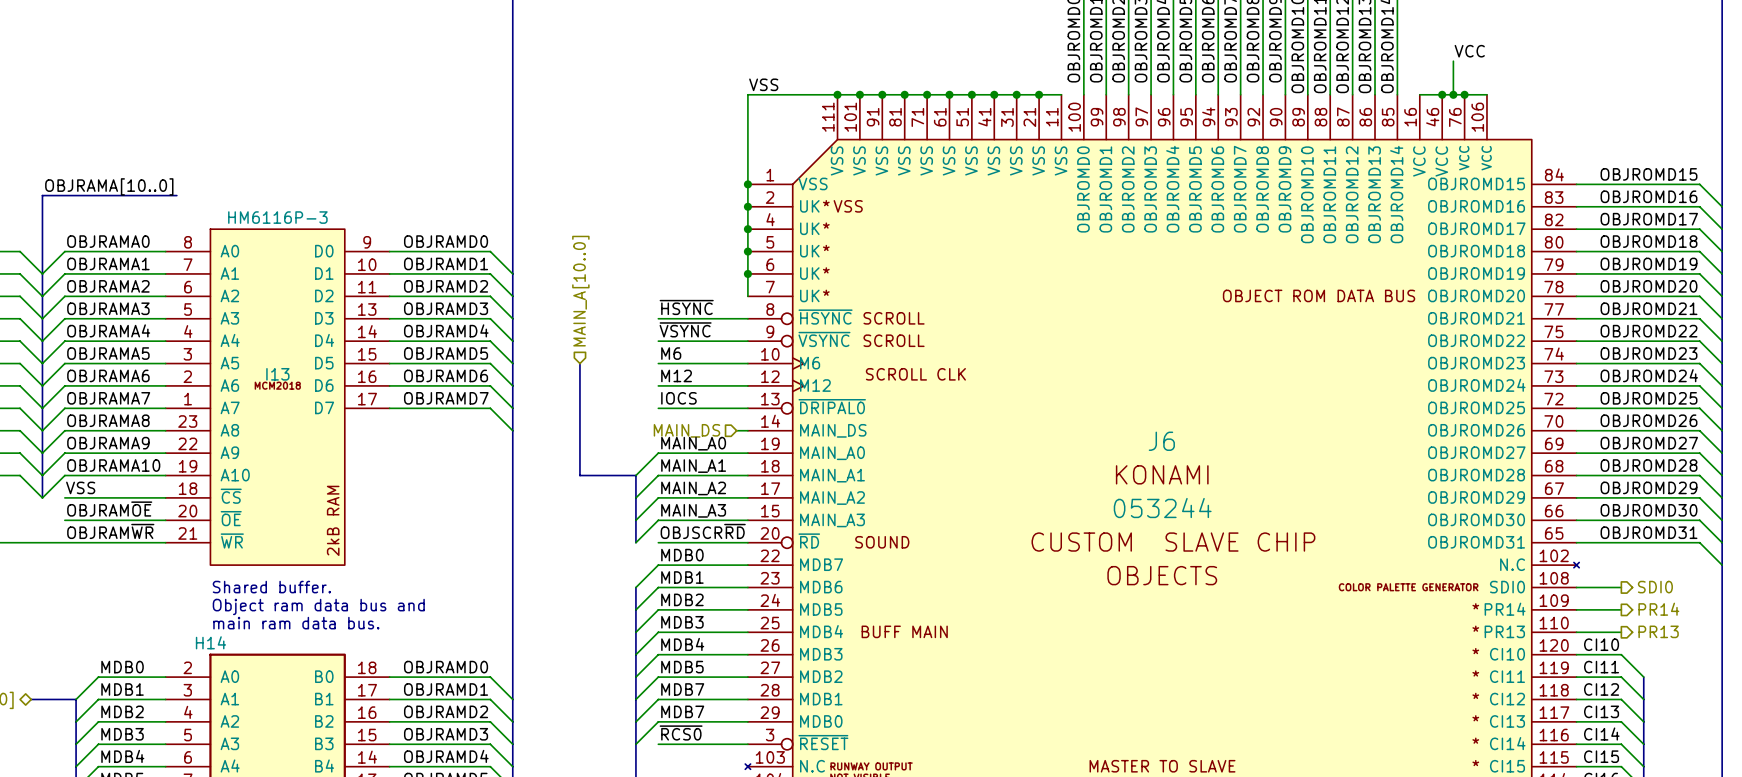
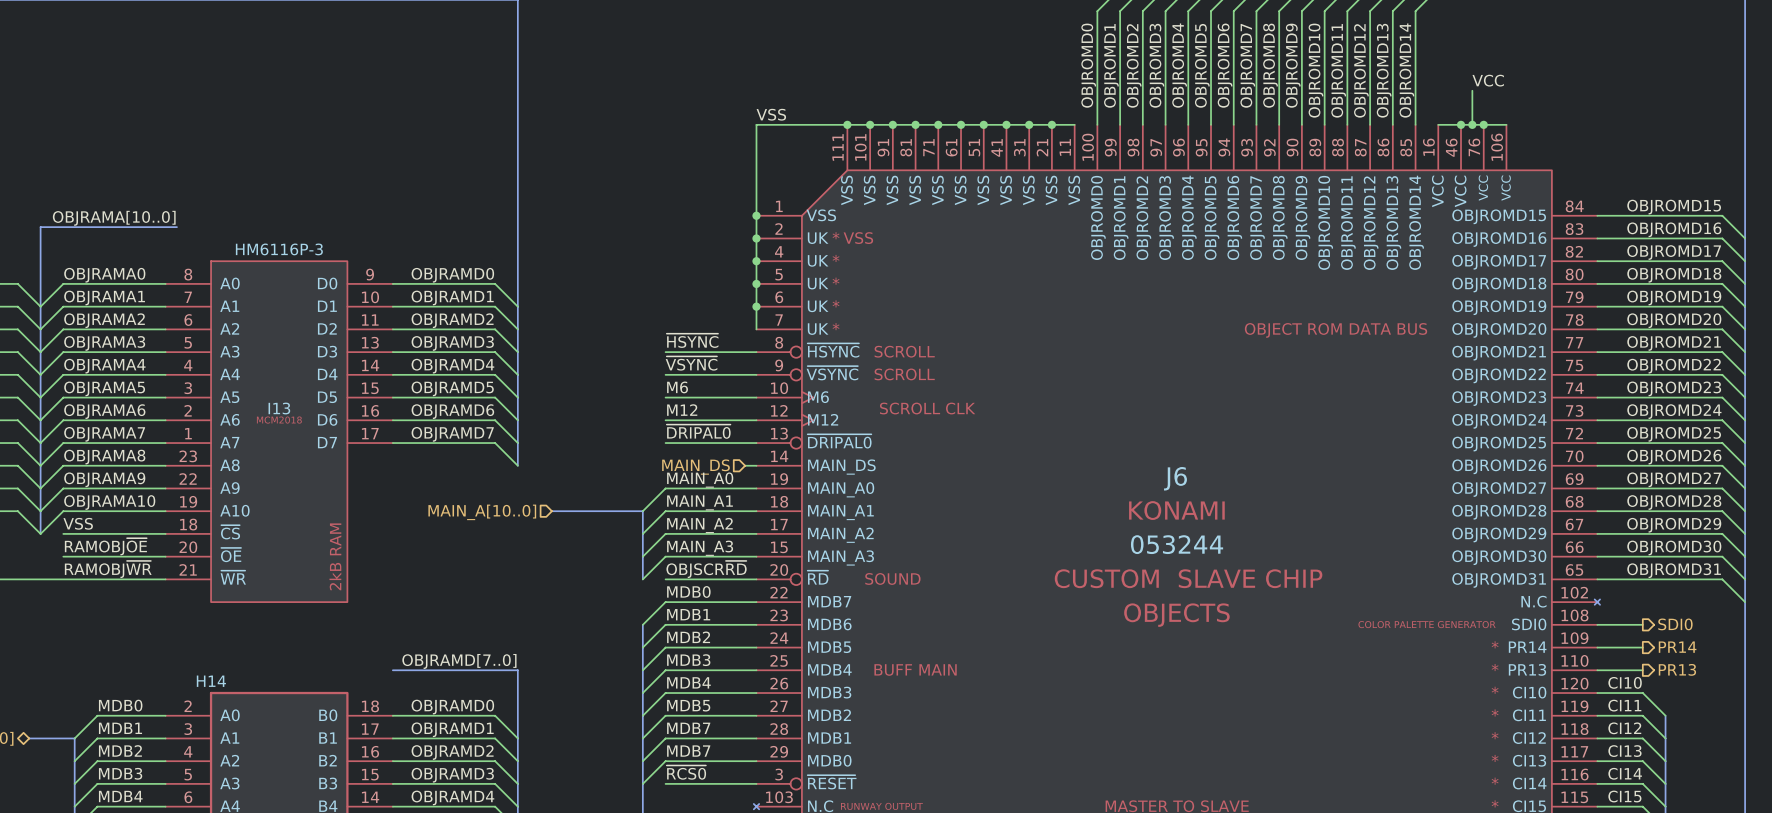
hierarchical label rotation: 0° (580, 291) -> 90° counterclockwise (482, 512)
hierarchical label position: MAIN_A[10..0] (580, 291) -> MAIN_A[10..0] (482, 512)
bus: (579, 363) (579, 475) -> (551, 511) (586, 511)
label: IOCS (678, 398) -> ~{DRIPAL0} (698, 431)
bus: (512, 430) (512, 632) -> (392, 670) (517, 670)
label: OBJRAM~{OE} (109, 509) -> RAMOBJ~{OE} (105, 546)
label: OBJRAM~{WR} (110, 531) -> RAMOBJ~{WR} (108, 569)
text: Shared buffer. (271, 587) -> none
text: Object ram data bus and (318, 606) -> none
text: main ram data bus. (296, 623) -> none
label: none -> OBJRAMD[7..0] (459, 661)

